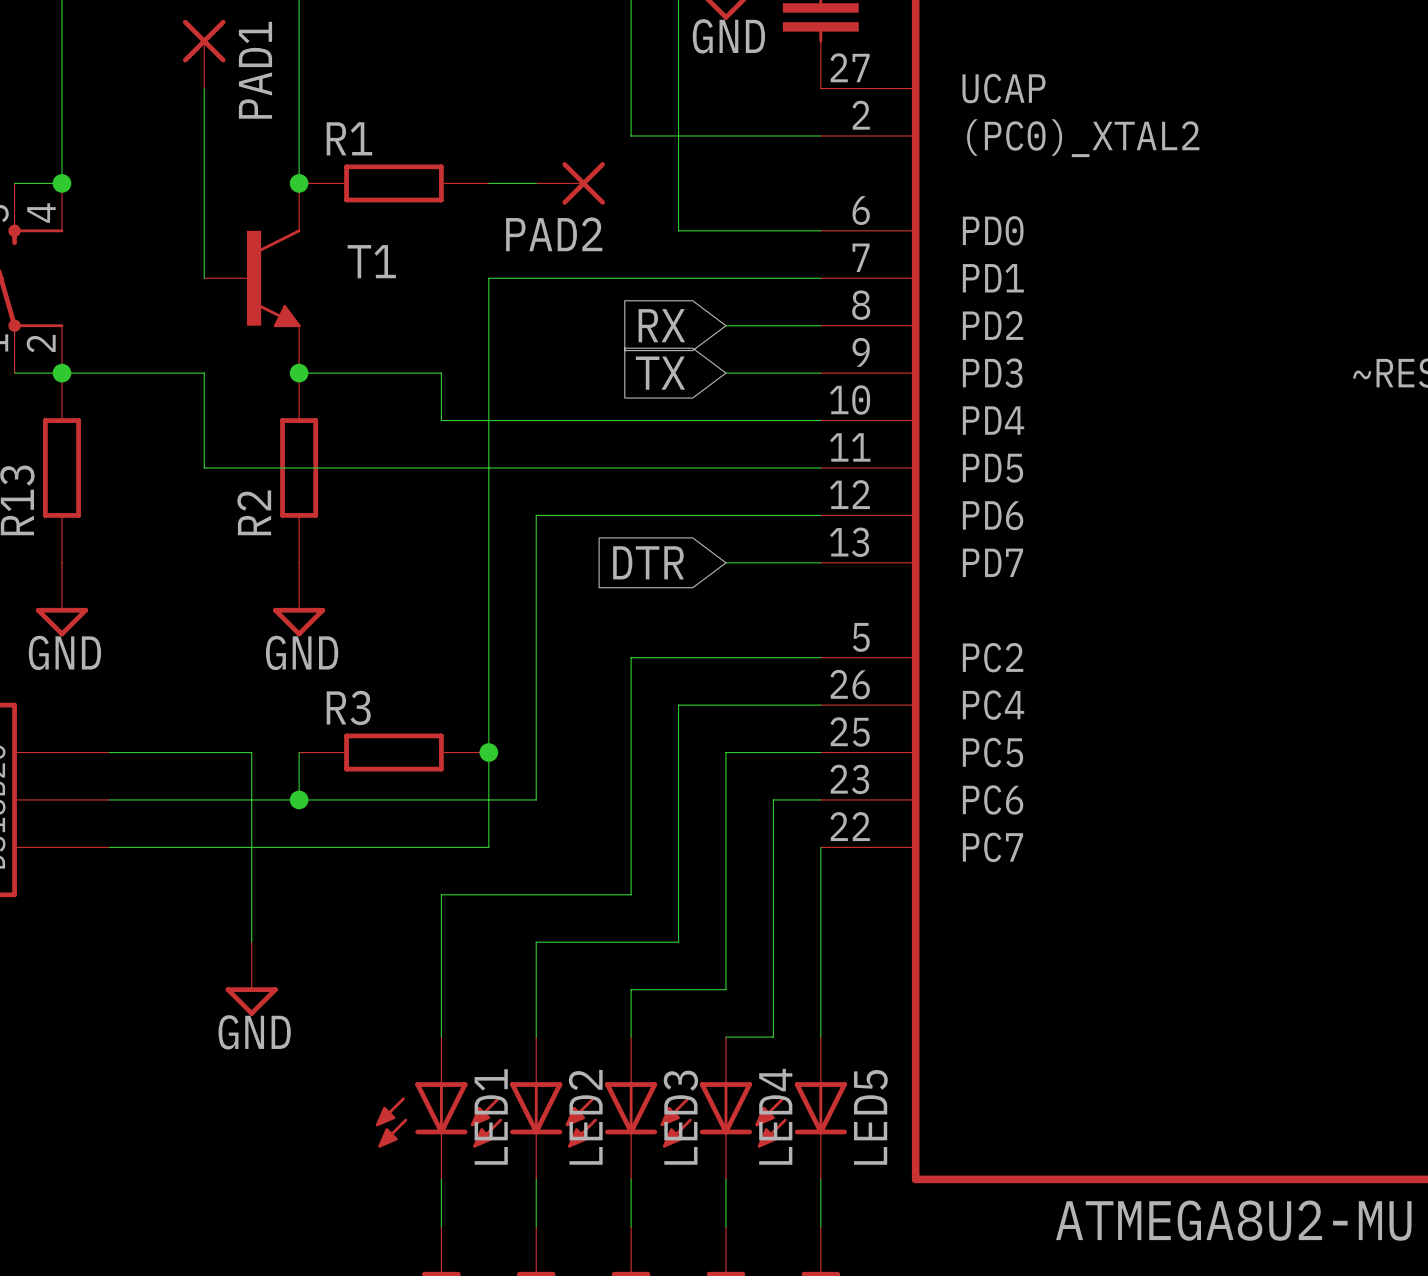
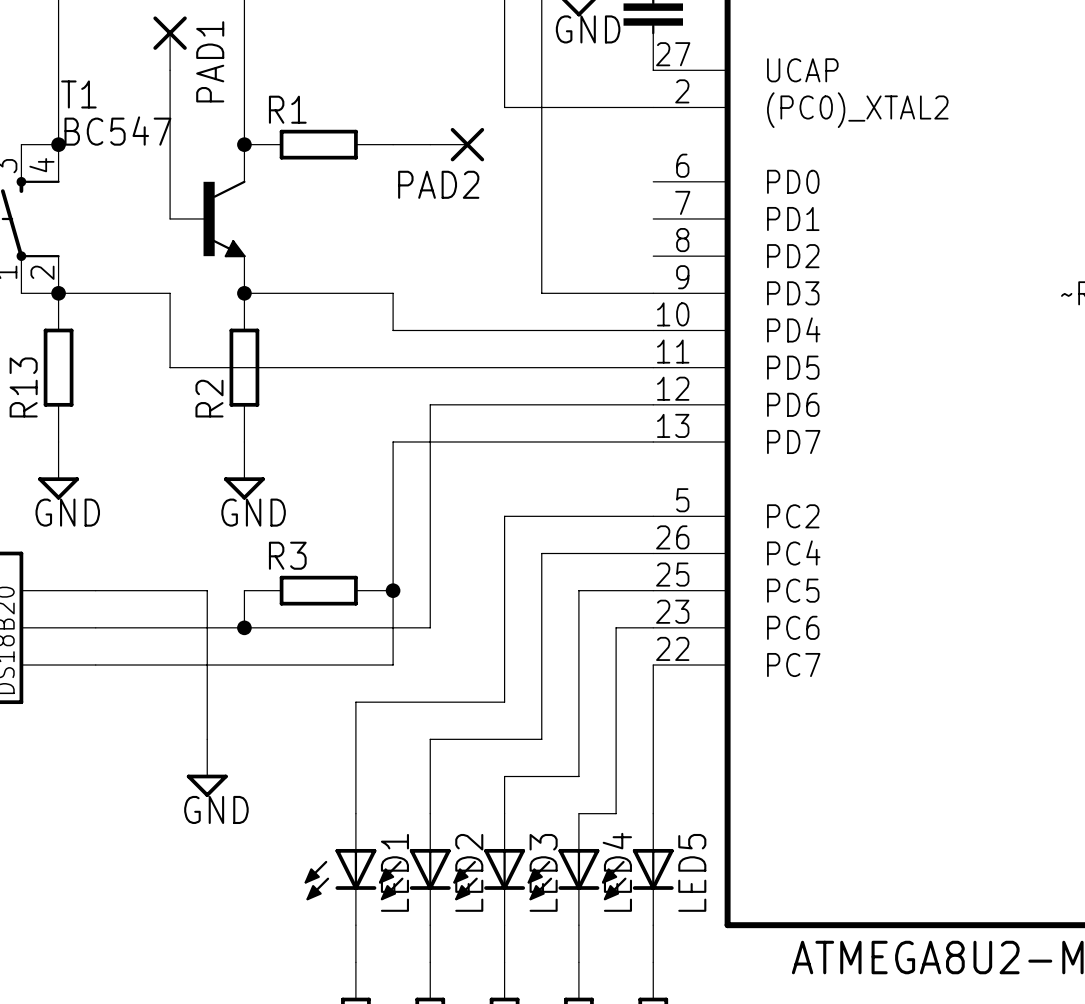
T1 value: none -> BC547 (117, 131)
wire: (678, 230) (820, 230) -> (541, 181) (541, 293) (578, 293)
T1 name position: T1 (371, 261) -> T1 (78, 94)
wire: (820, 278) (488, 278) (488, 373) -> none
global label: RX (661, 325) -> none
wire: (725, 325) (820, 325) -> none
wire: (441, 373) (441, 420) (488, 420) (488, 562) -> (355, 293) (393, 293)
global label: TX (660, 373) -> none
wire: none -> (393, 441) (578, 441)
global label: DTR (648, 562) -> none

